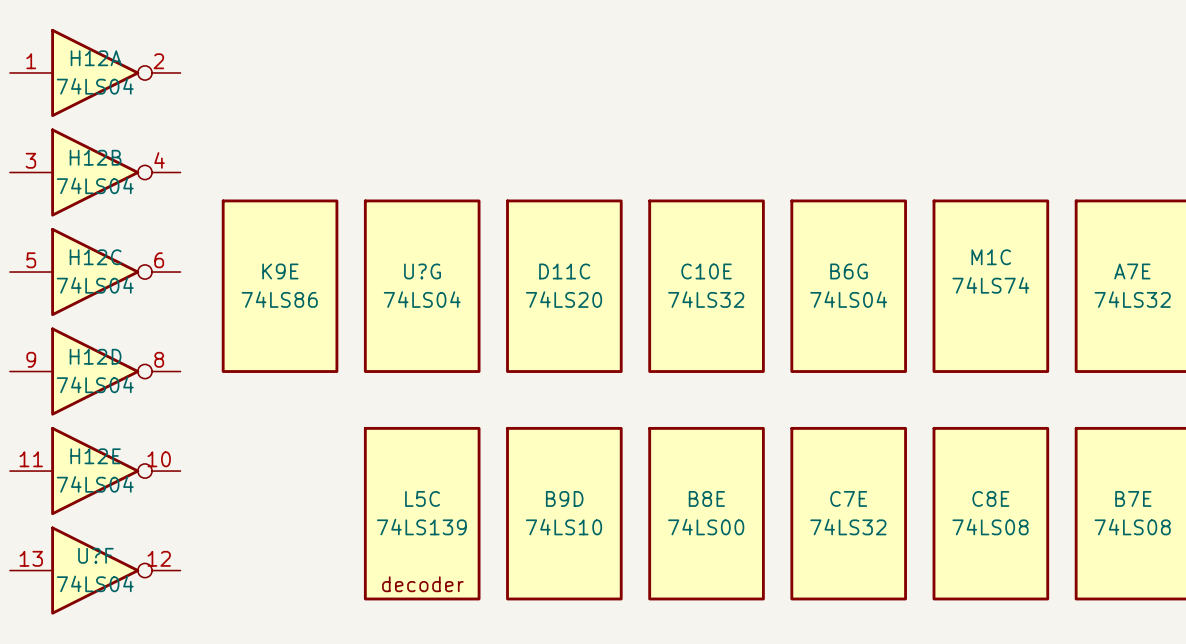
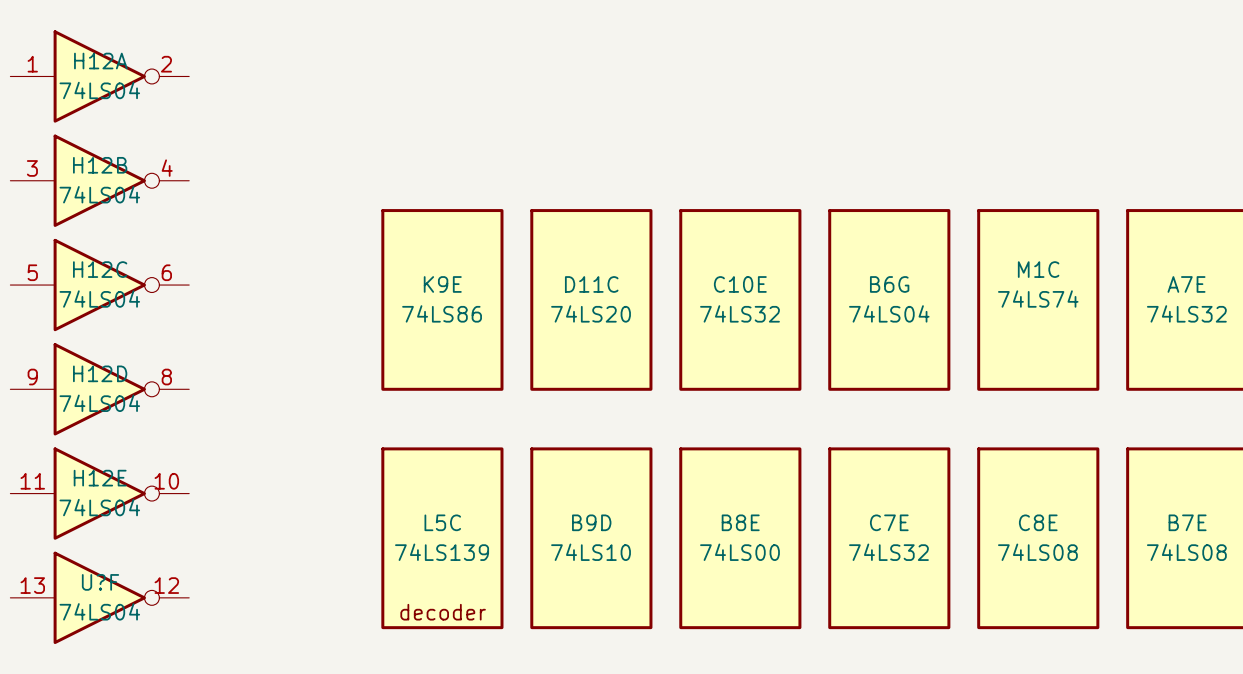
U?G name: U?G (422, 271) -> K9E (442, 284)
K9E: 74LS86 (280, 286) -> none
U?G value: 74LS04 (422, 299) -> 74LS86 (442, 313)

